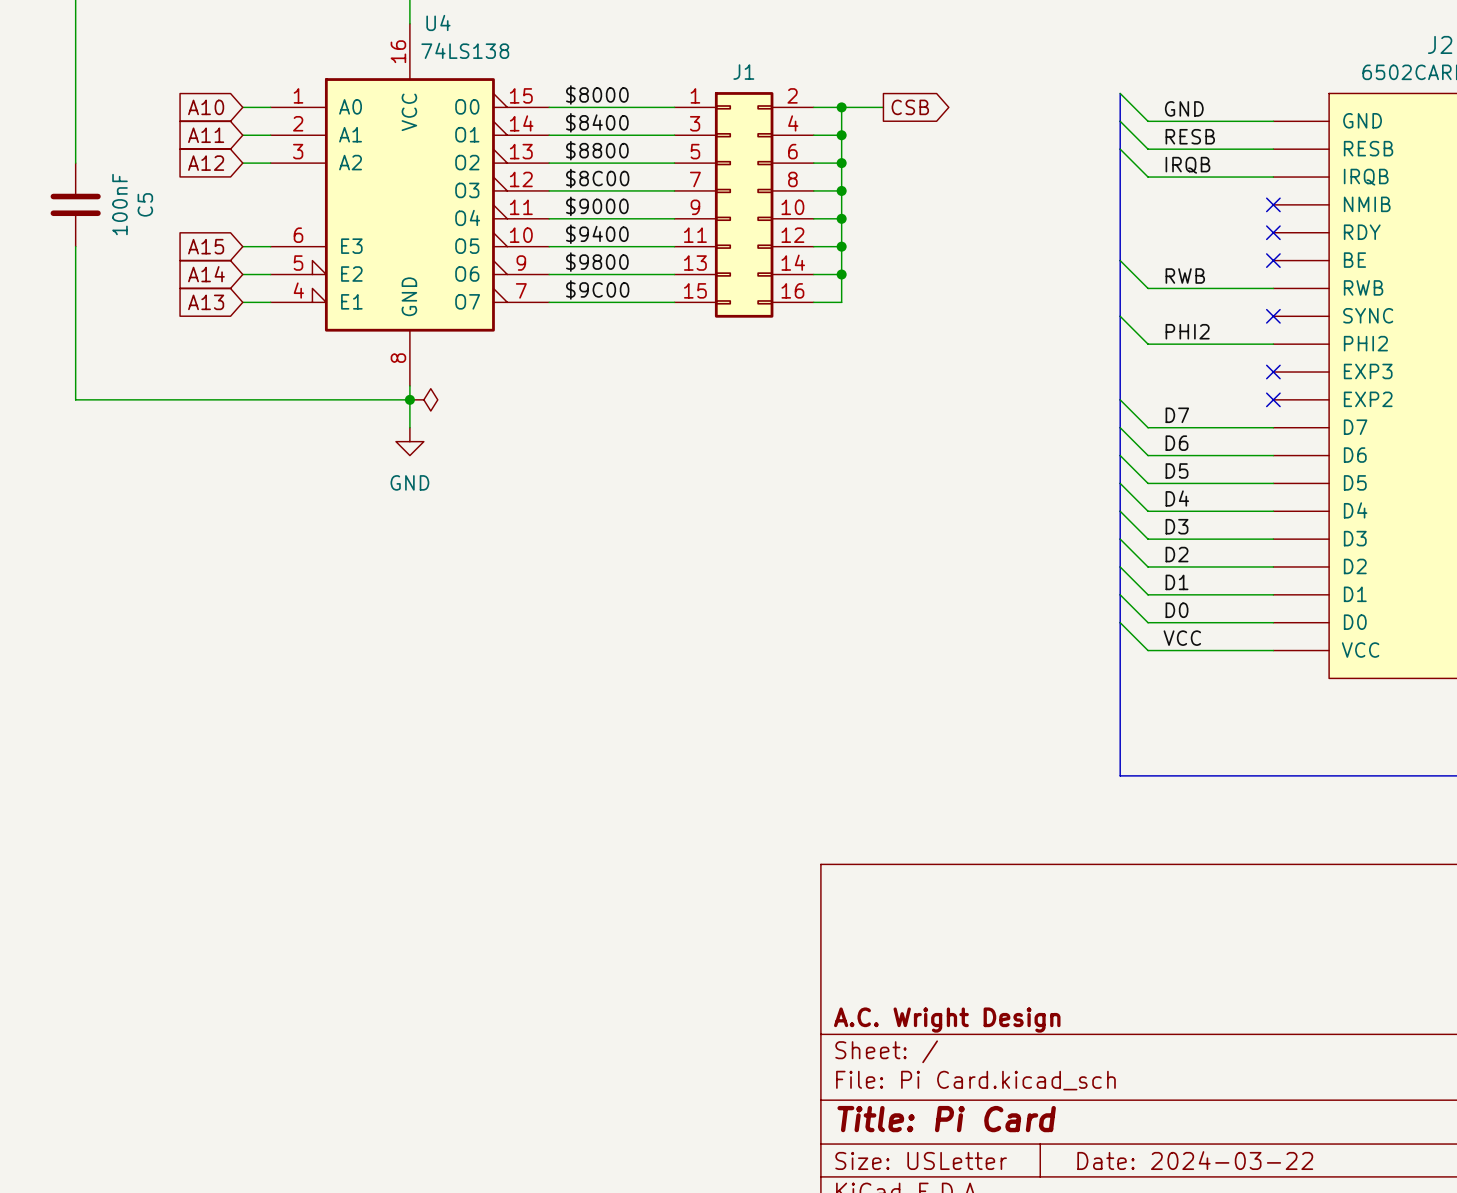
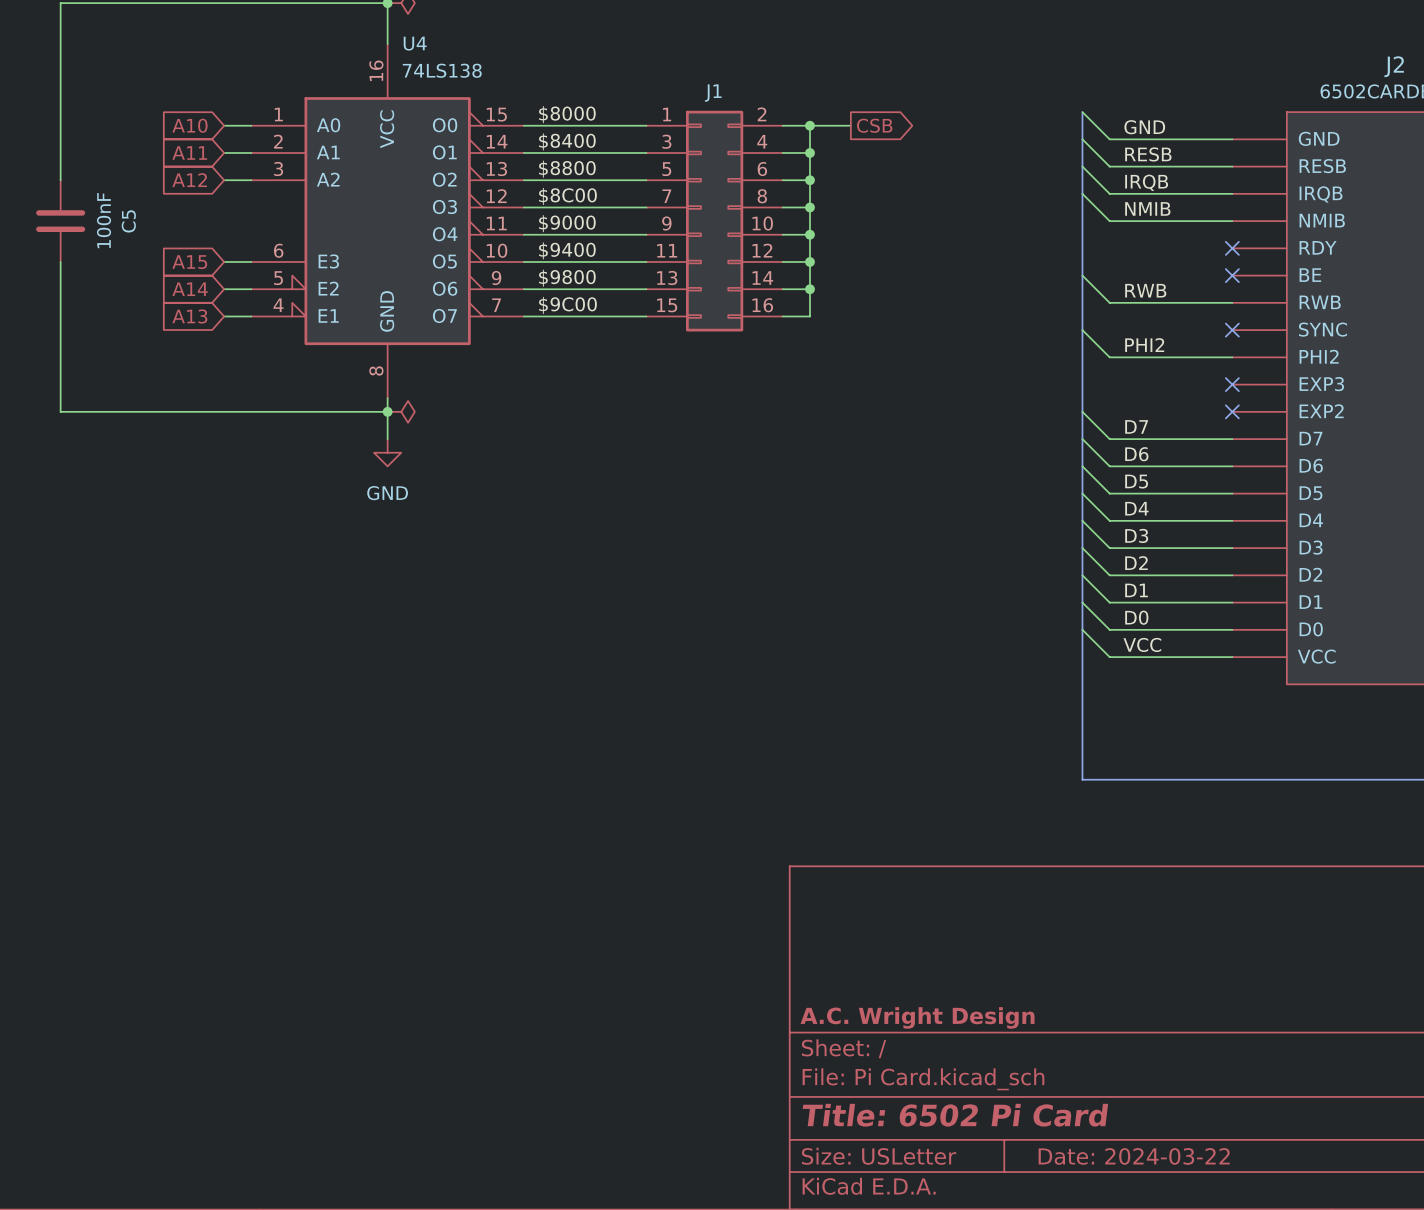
wire: none -> (1082, 193) (1109, 221) (1232, 221)
label: none -> NMIB (1147, 208)
no-connect mark: (1273, 204) -> none
title block: Title: Pi Card (946, 1119) -> Title: 6502 Pi Card (955, 1115)

